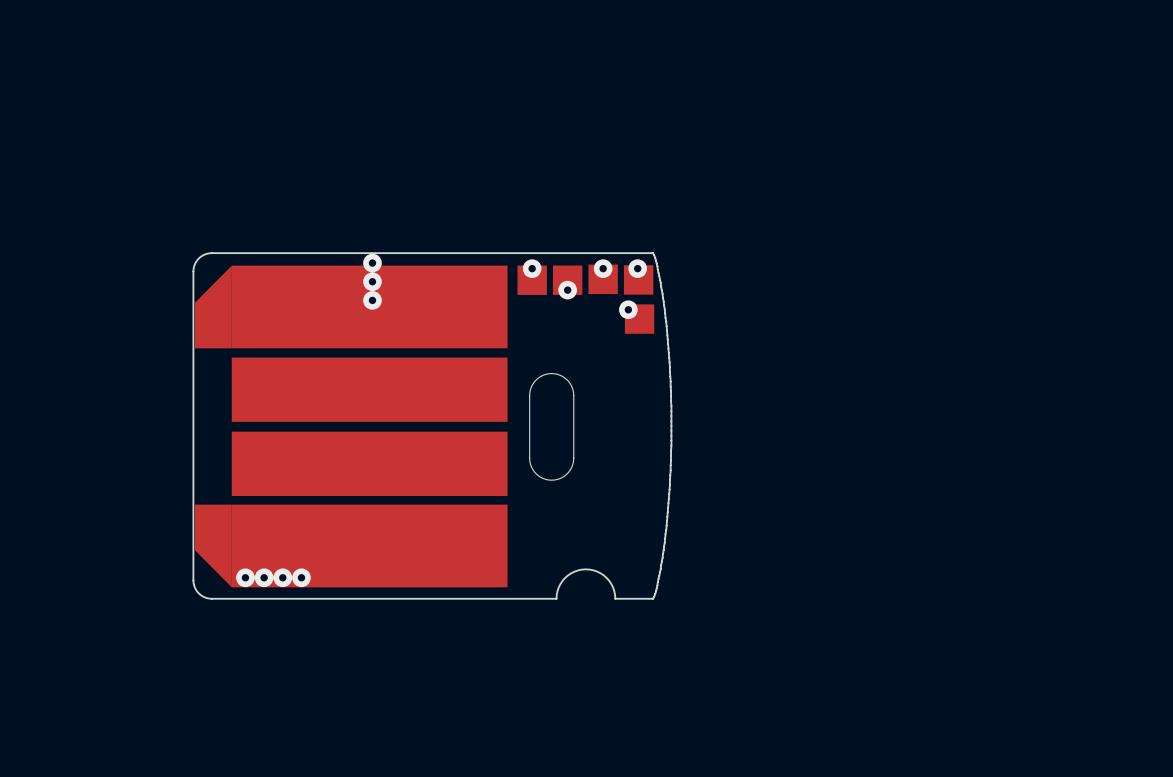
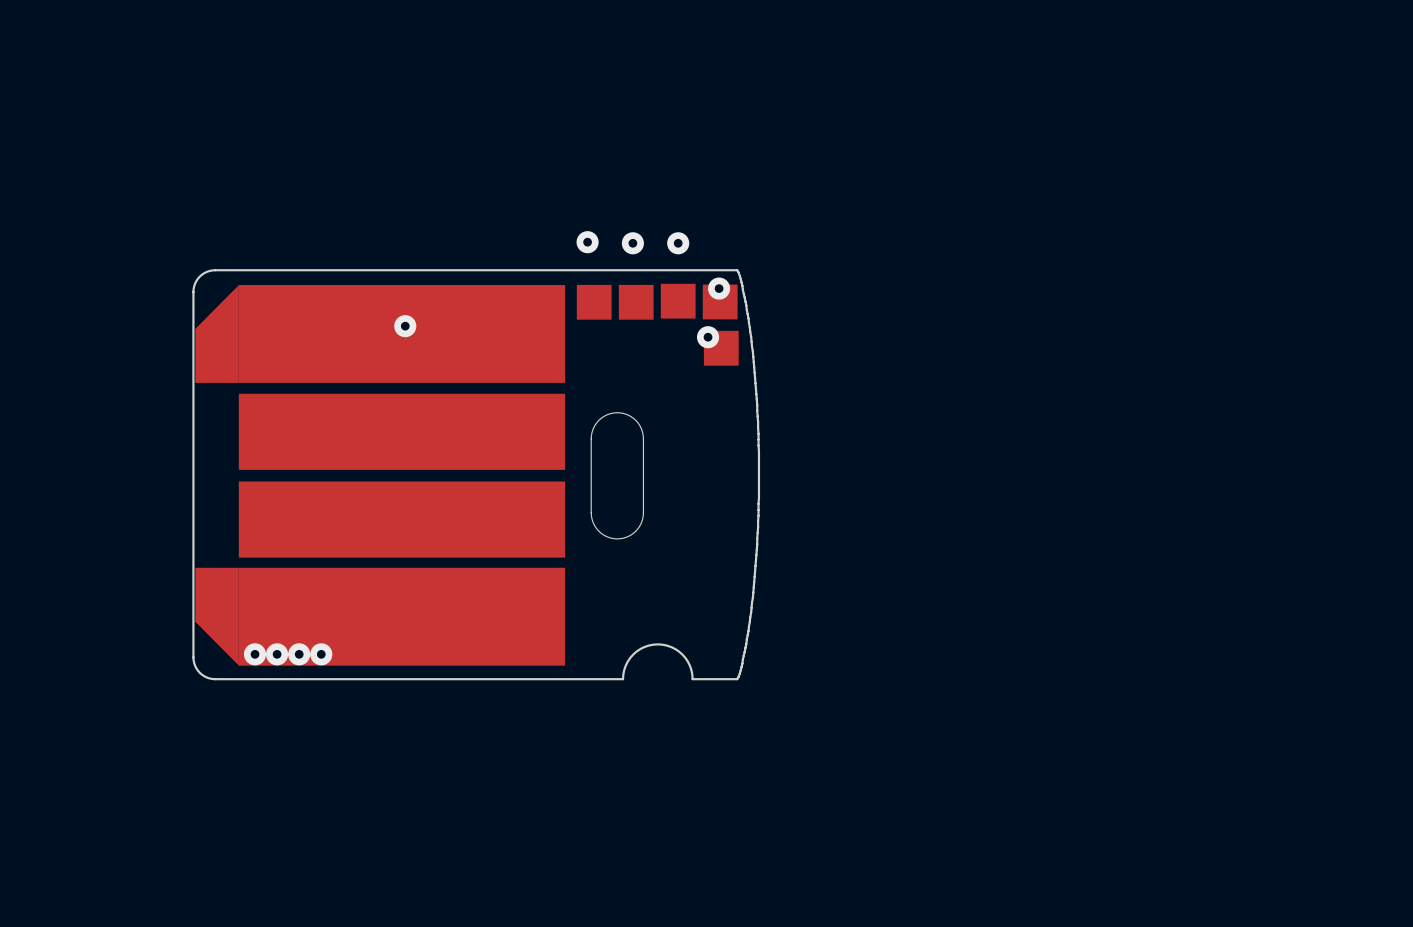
via: none -> (587, 242)
via: none -> (632, 243)
via: none -> (678, 243)
via: (372, 263) -> none
via: (532, 268) -> none
via: (603, 268) -> none
via: (372, 281) -> none
via: (567, 290) -> none

